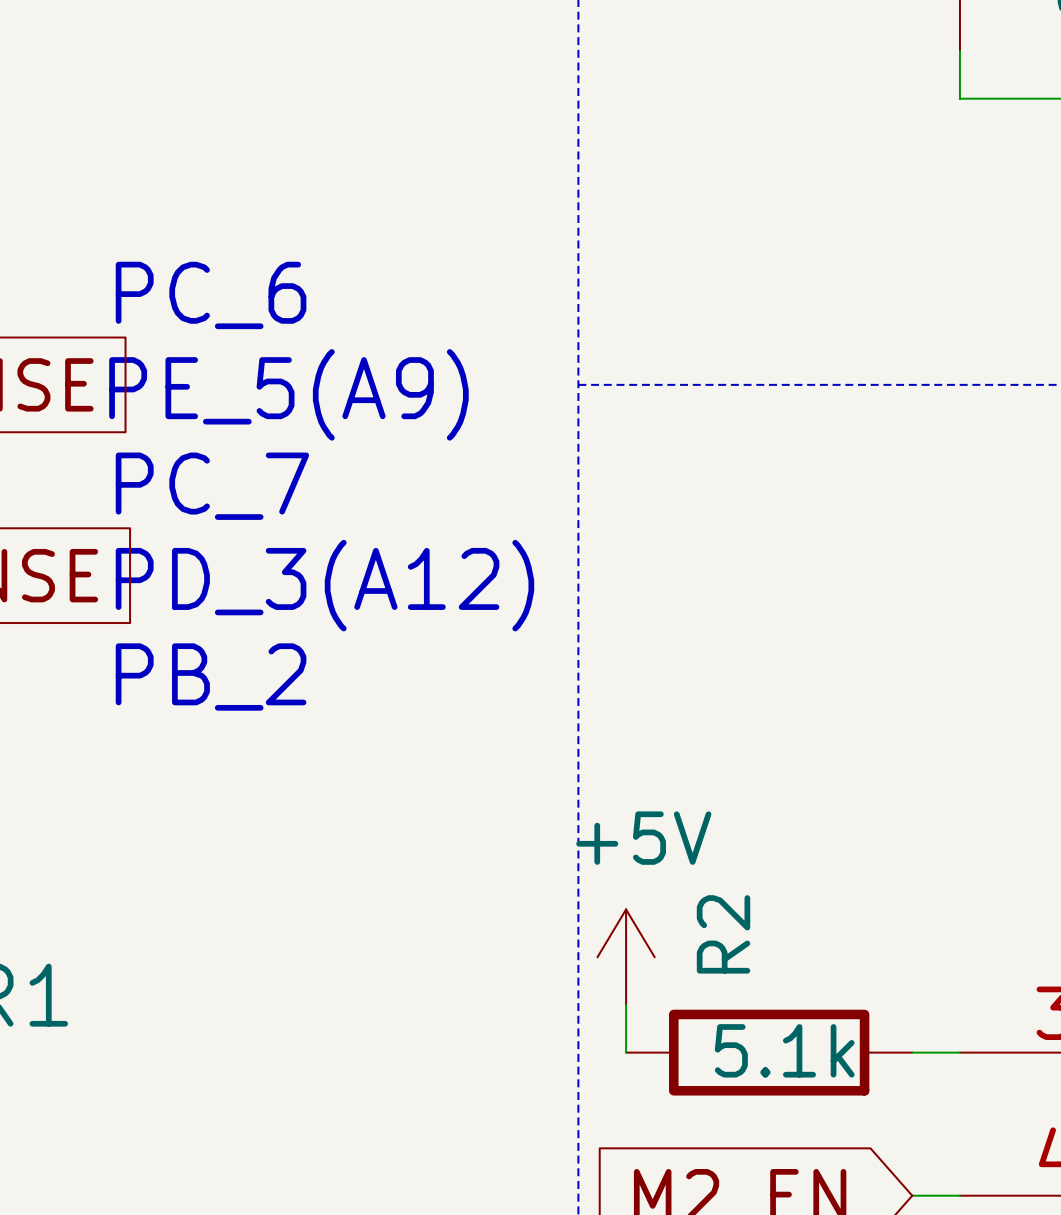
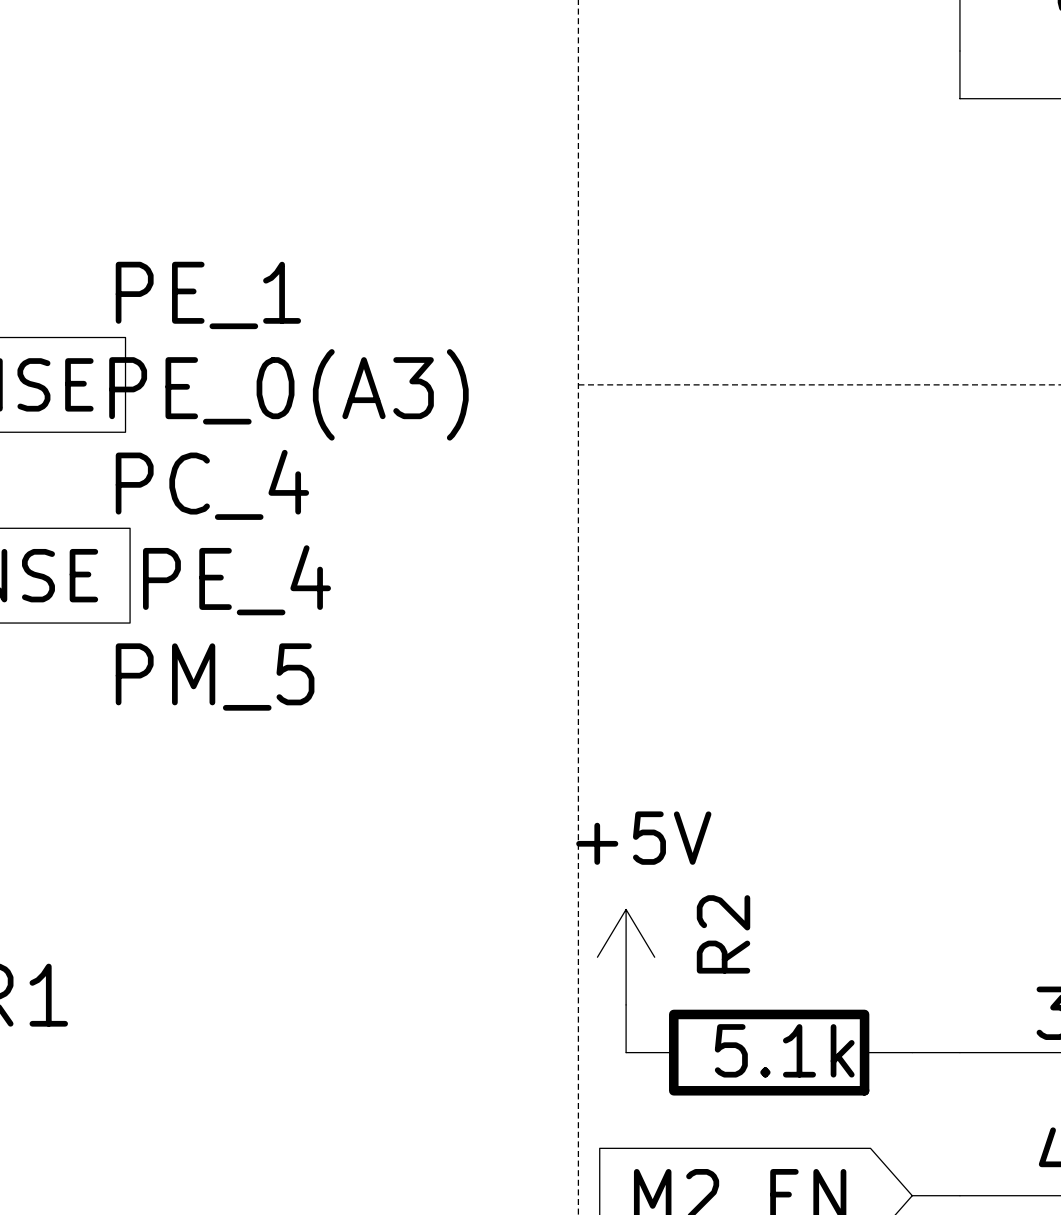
text: PC_6 (211, 295) -> PE_1 (208, 295)
text: PE_5(A9) (288, 394) -> PE_0(A3) (288, 394)
text: PC_7 (212, 486) -> PC_4 (212, 484)
text: none -> PE_4 (236, 580)
text: PD_3(A12) (324, 585) -> none
text: PB_2 (211, 677) -> PM_5 (215, 677)

